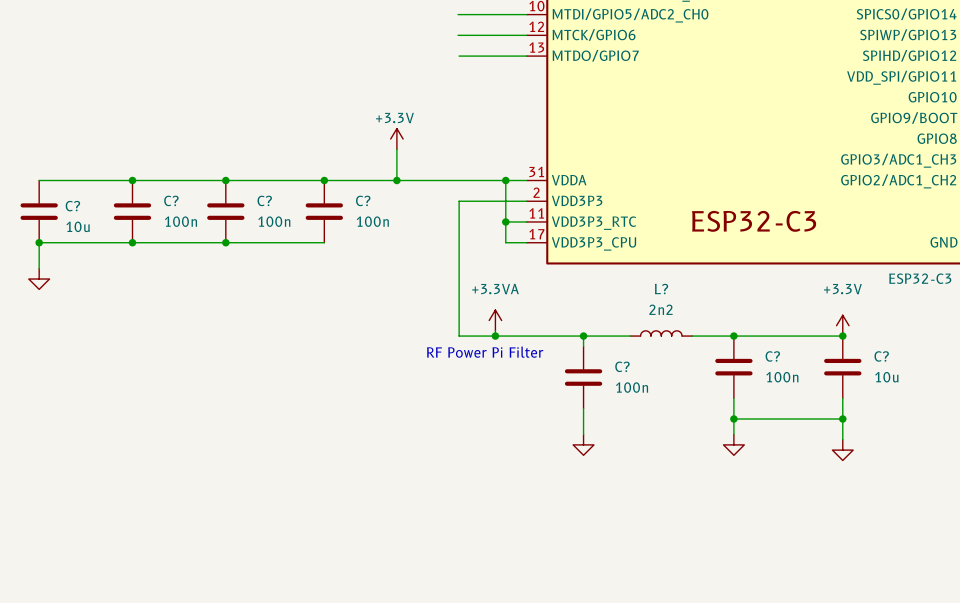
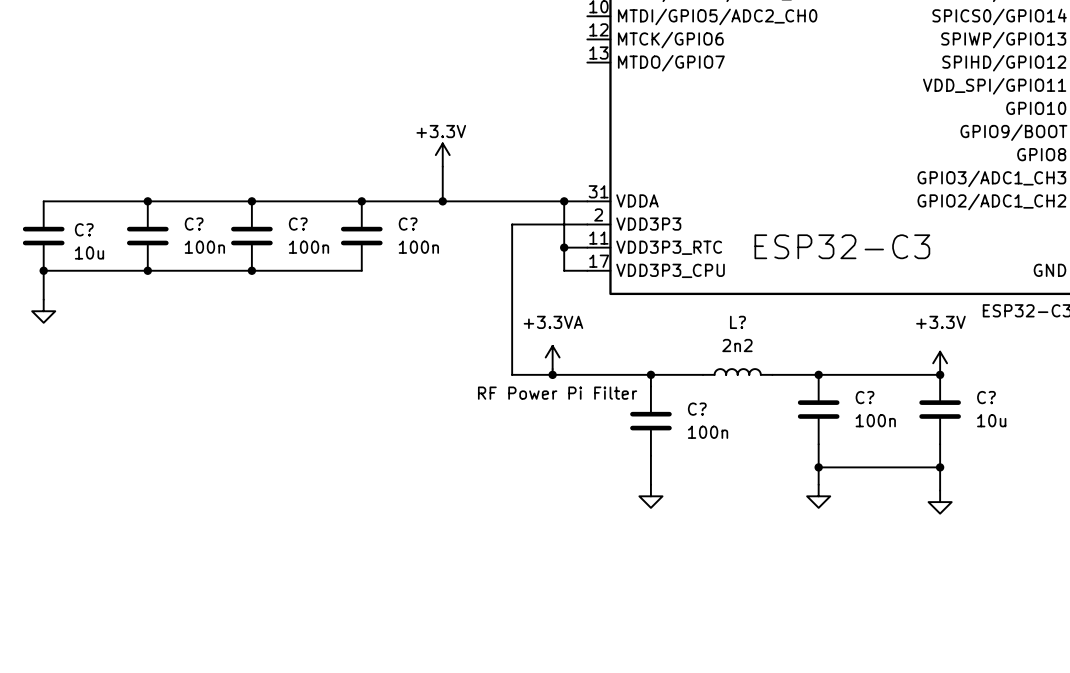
wire: (458, 14) (526, 14) -> none
wire: (458, 35) (526, 35) -> none
wire: (459, 56) (526, 56) -> none

